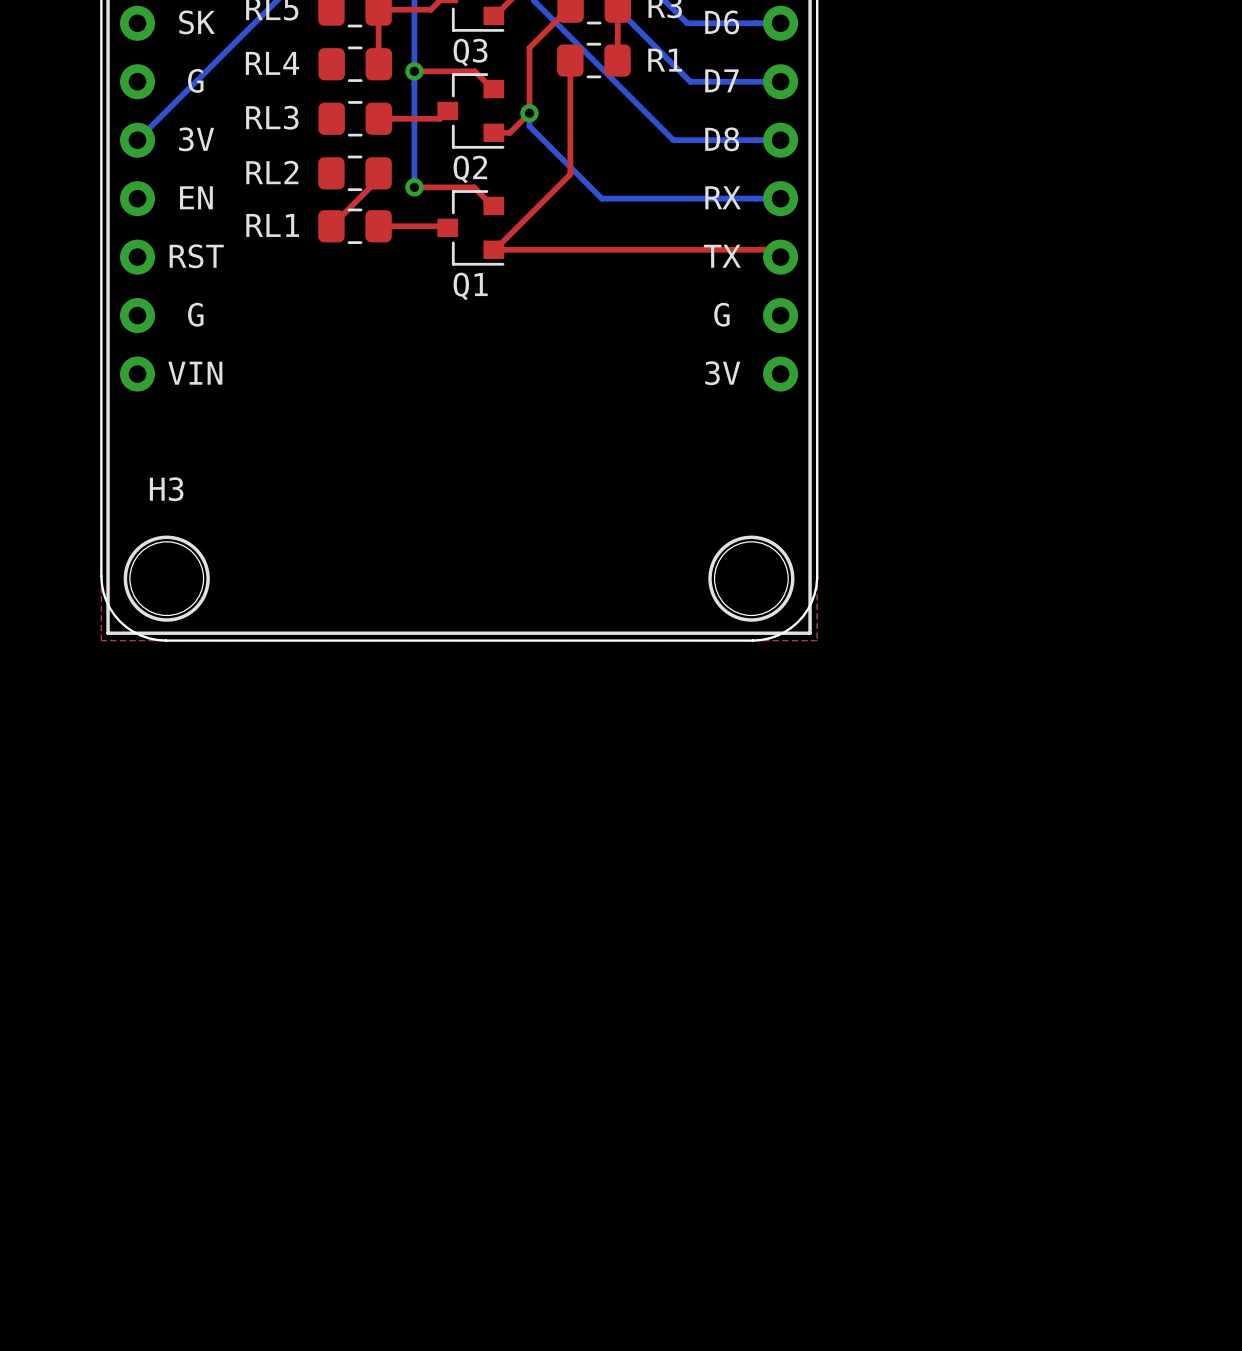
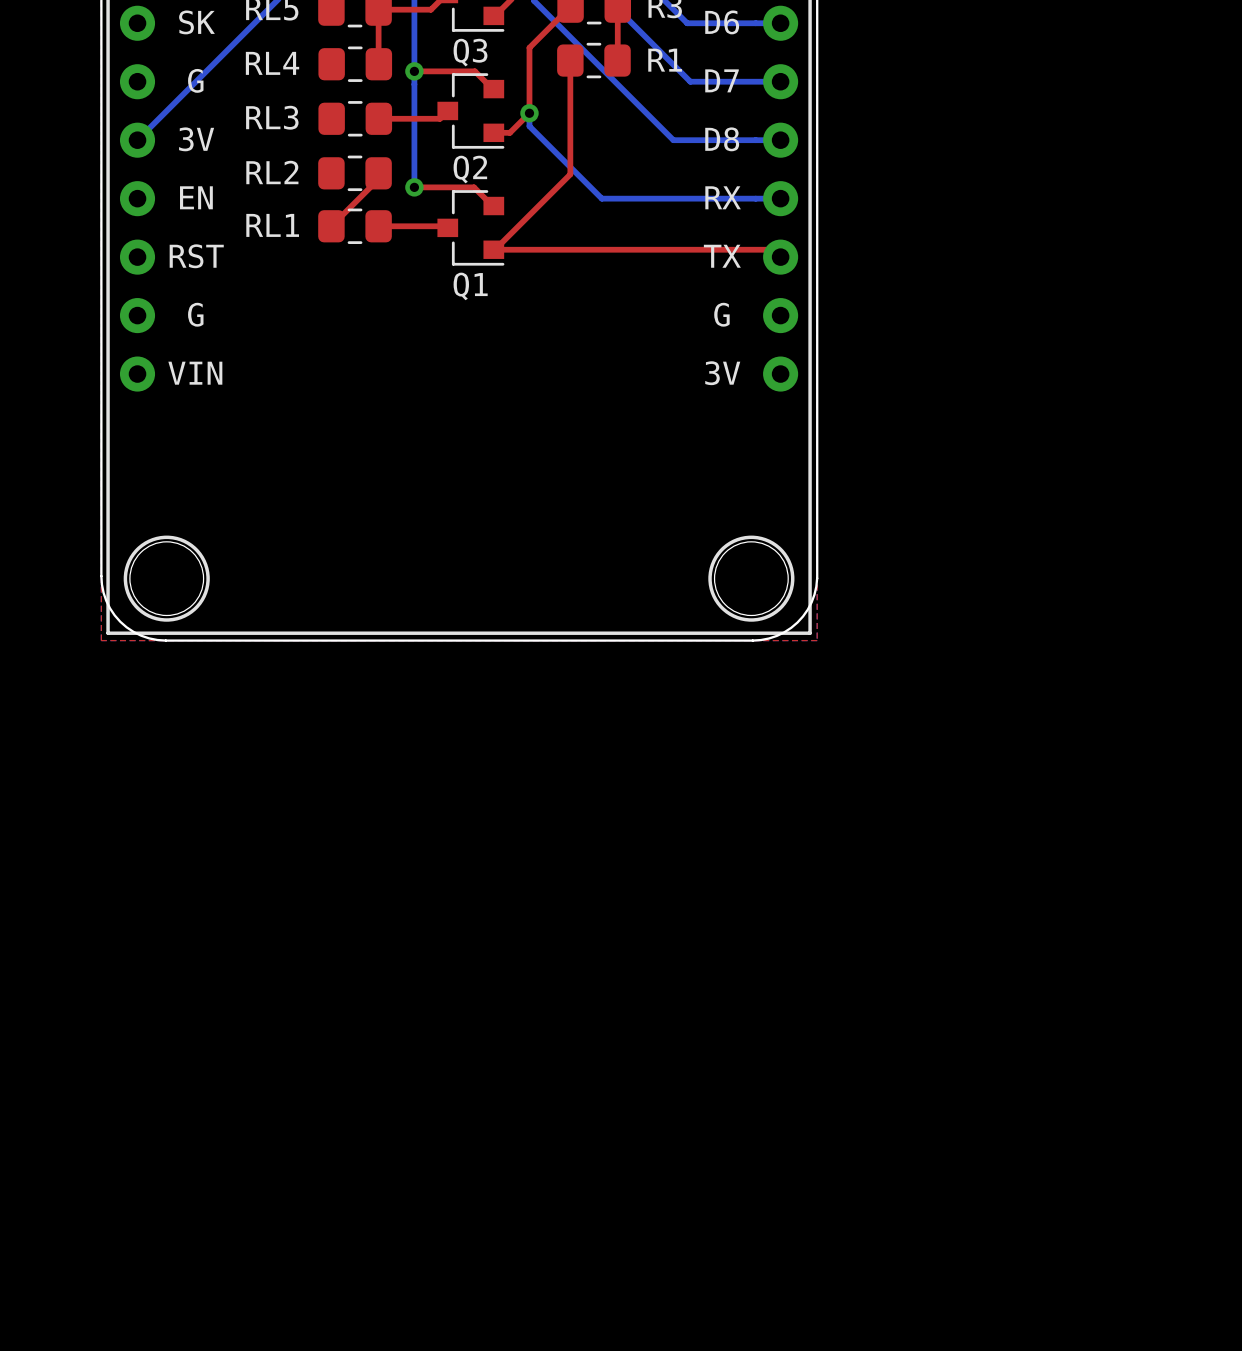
H3 name: H3 (166, 489) -> none

